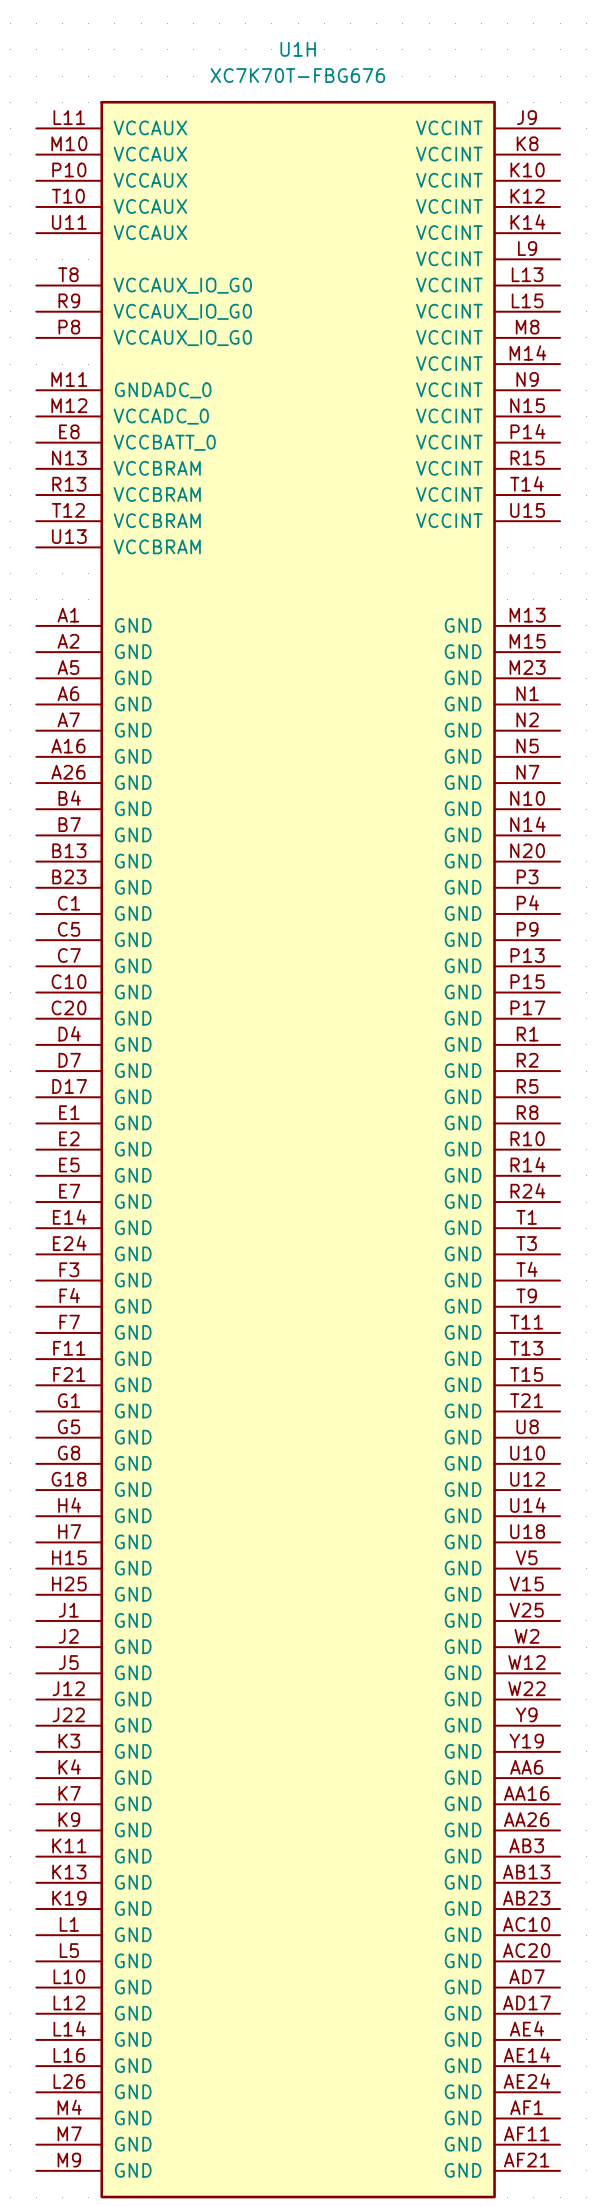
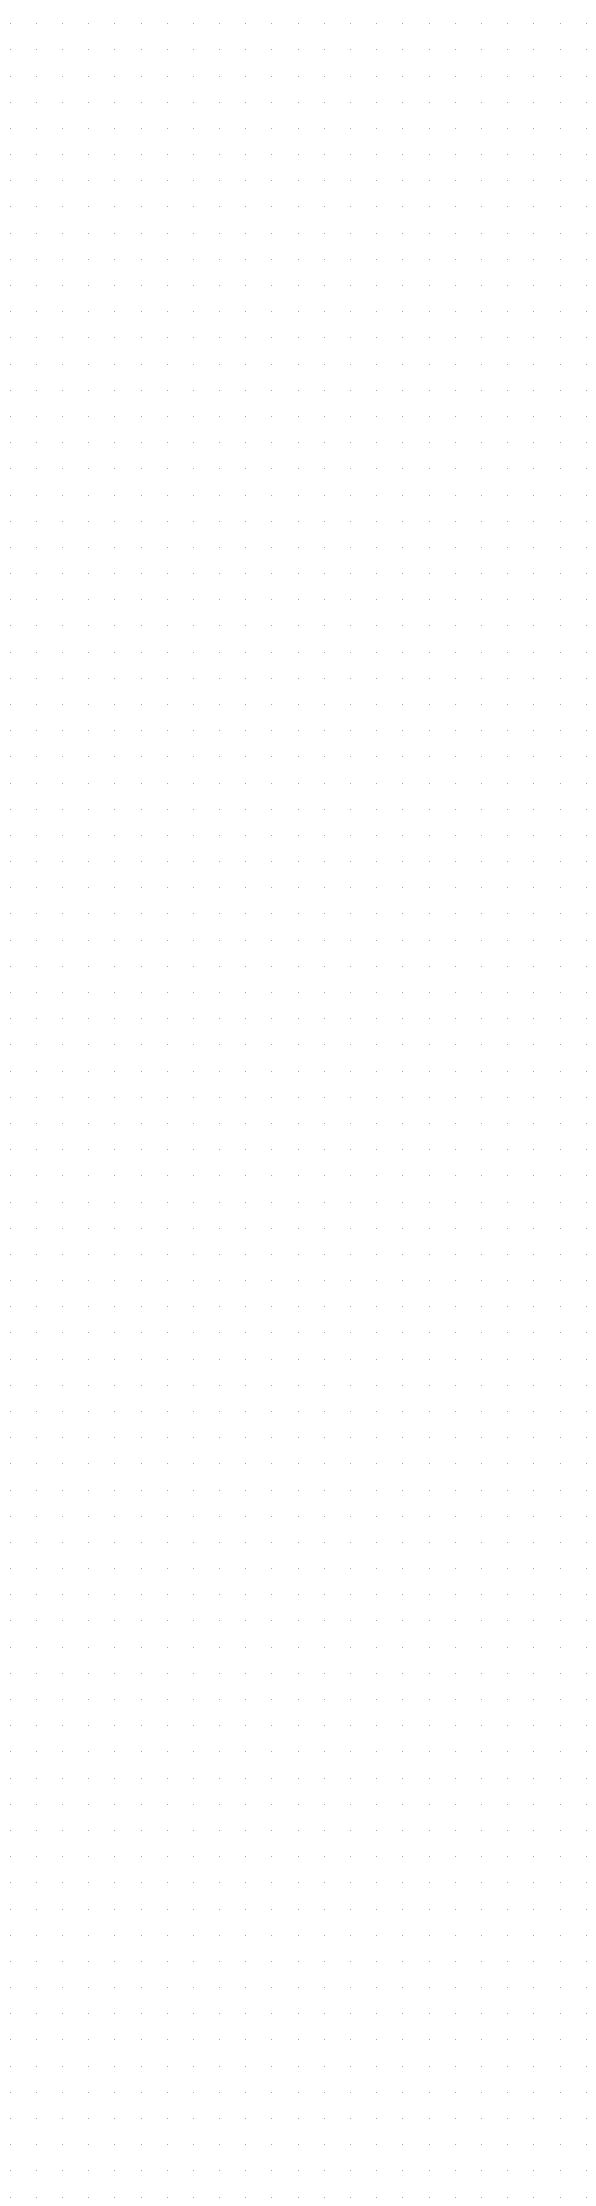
U1H: XC7K70T-FBG676 (298, 1149) -> none

